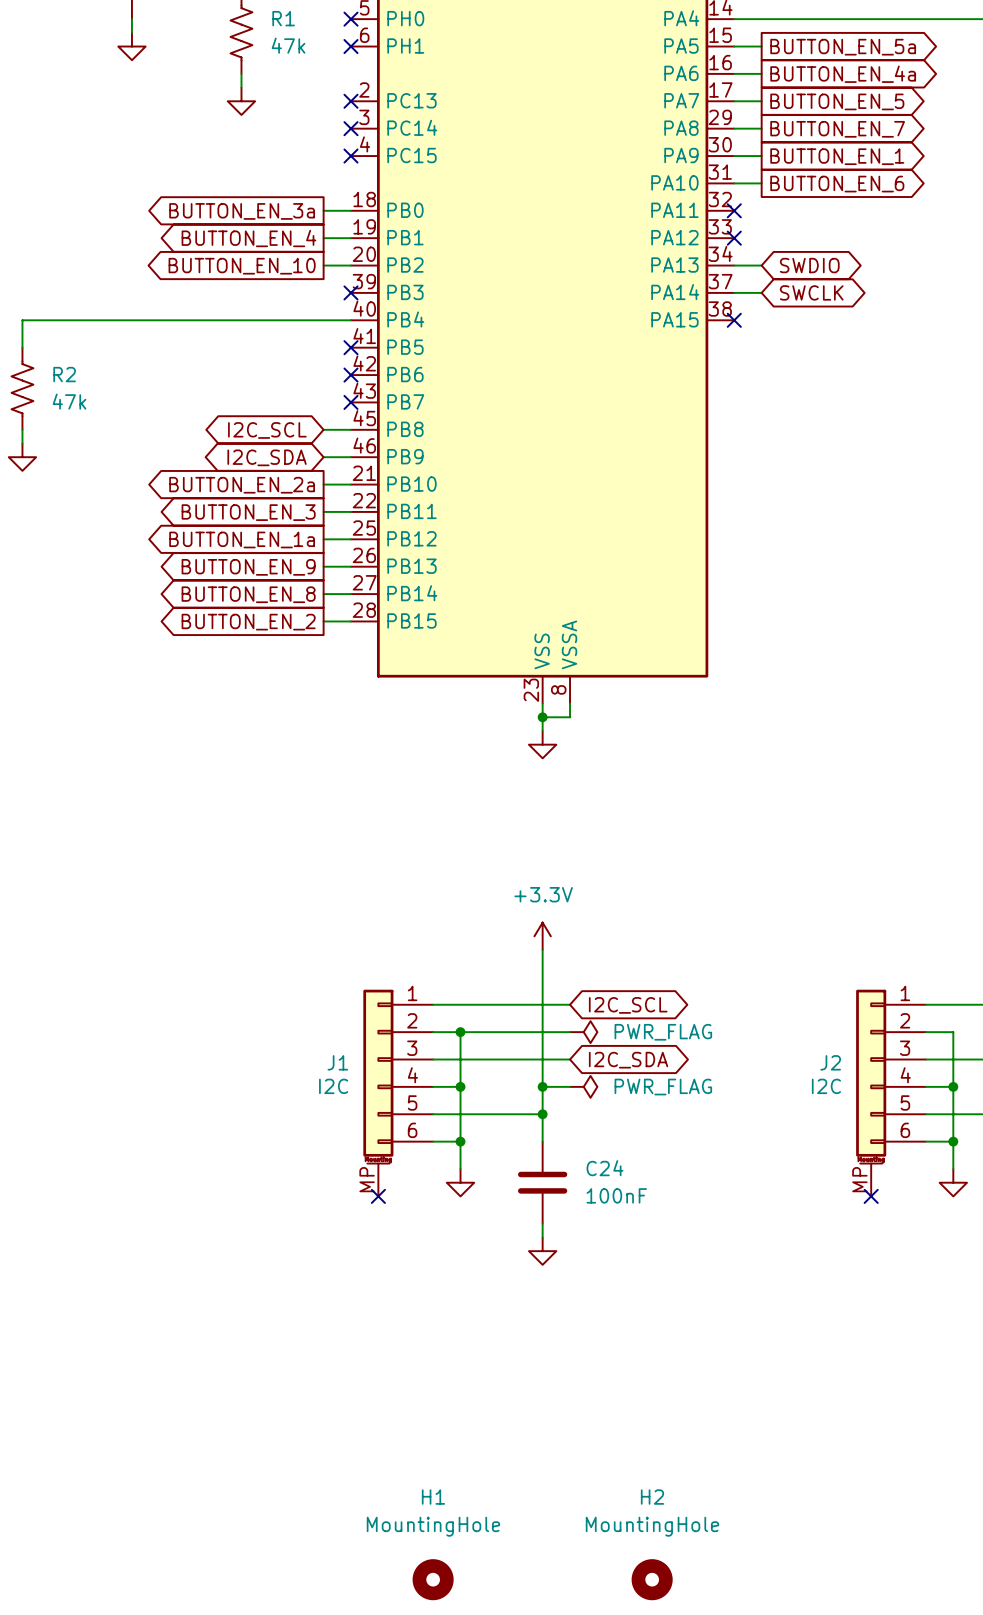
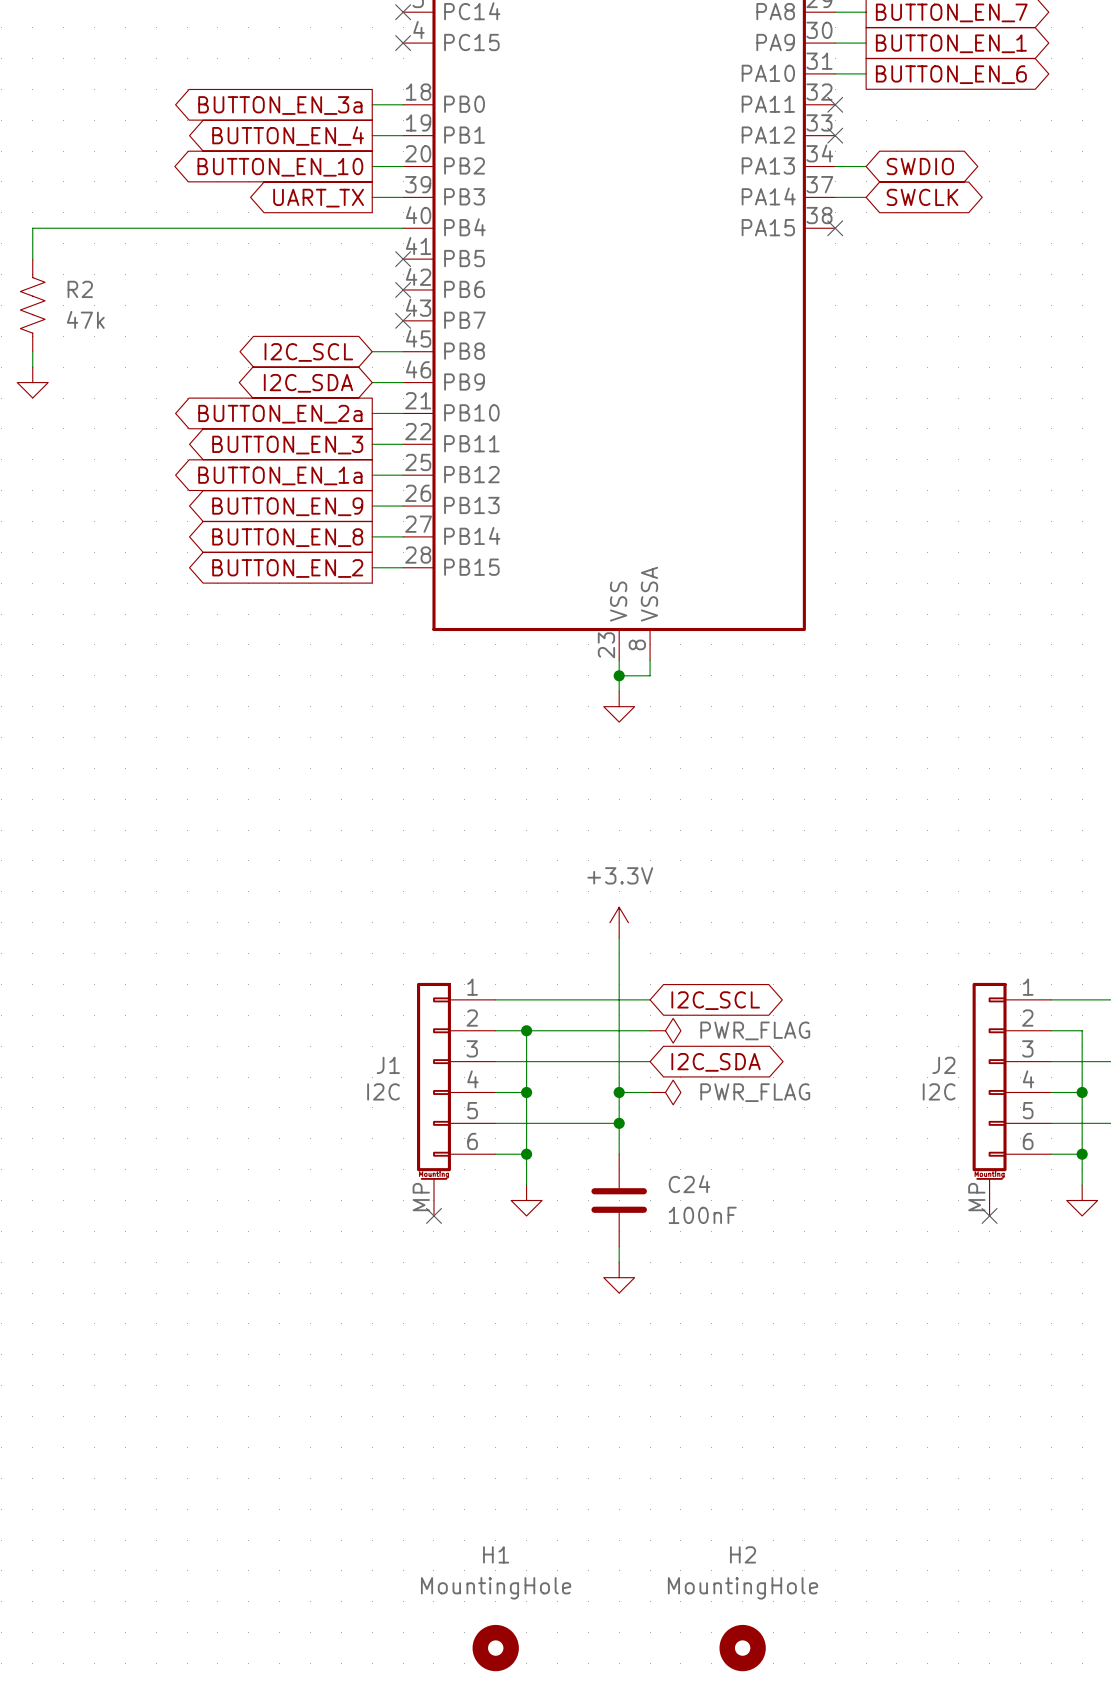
wire: none -> (372, 197) (403, 197)
no-connect mark: (350, 292) -> none
global label: none -> UART_TX (318, 198)

